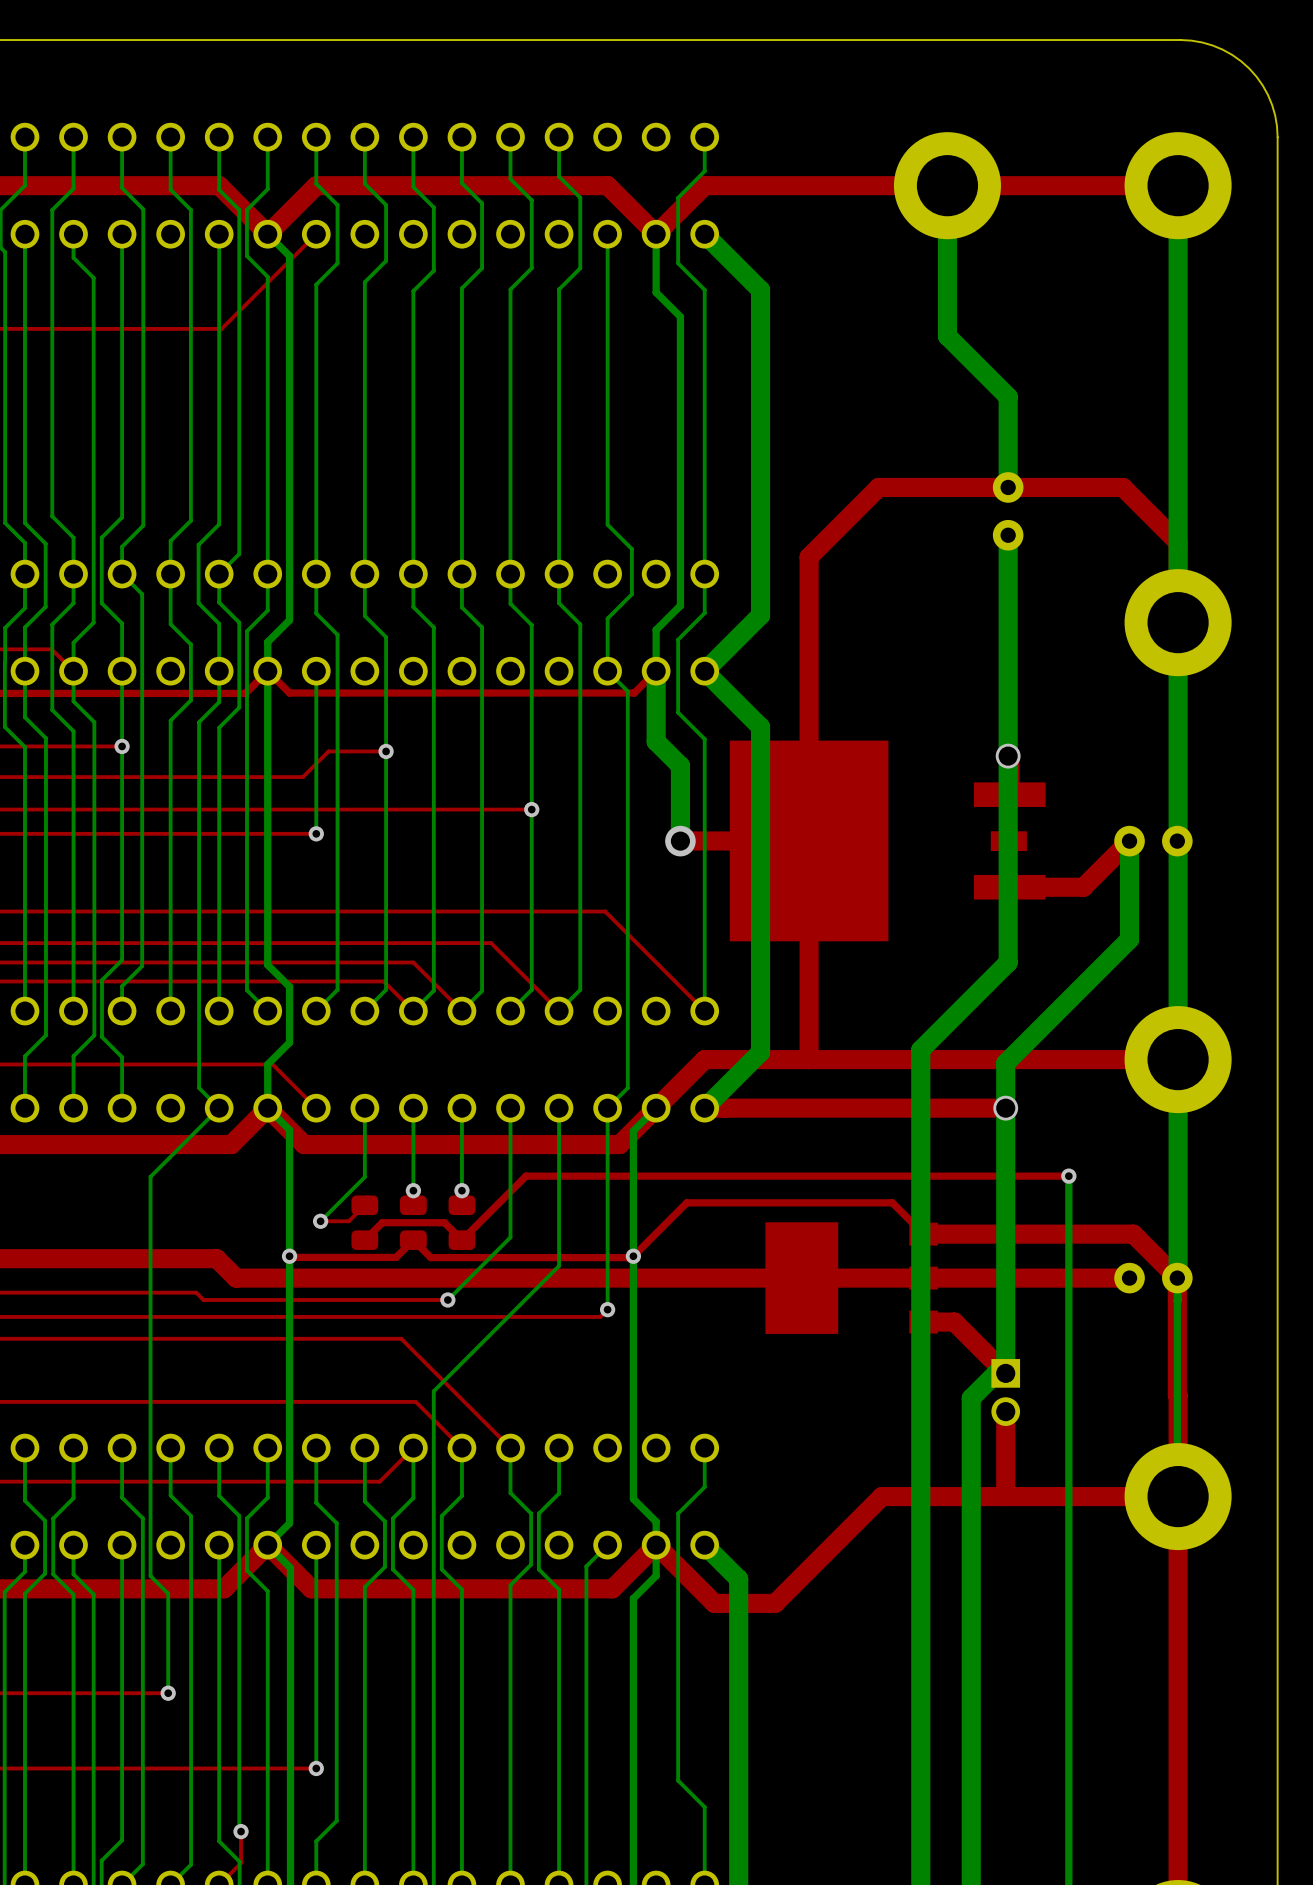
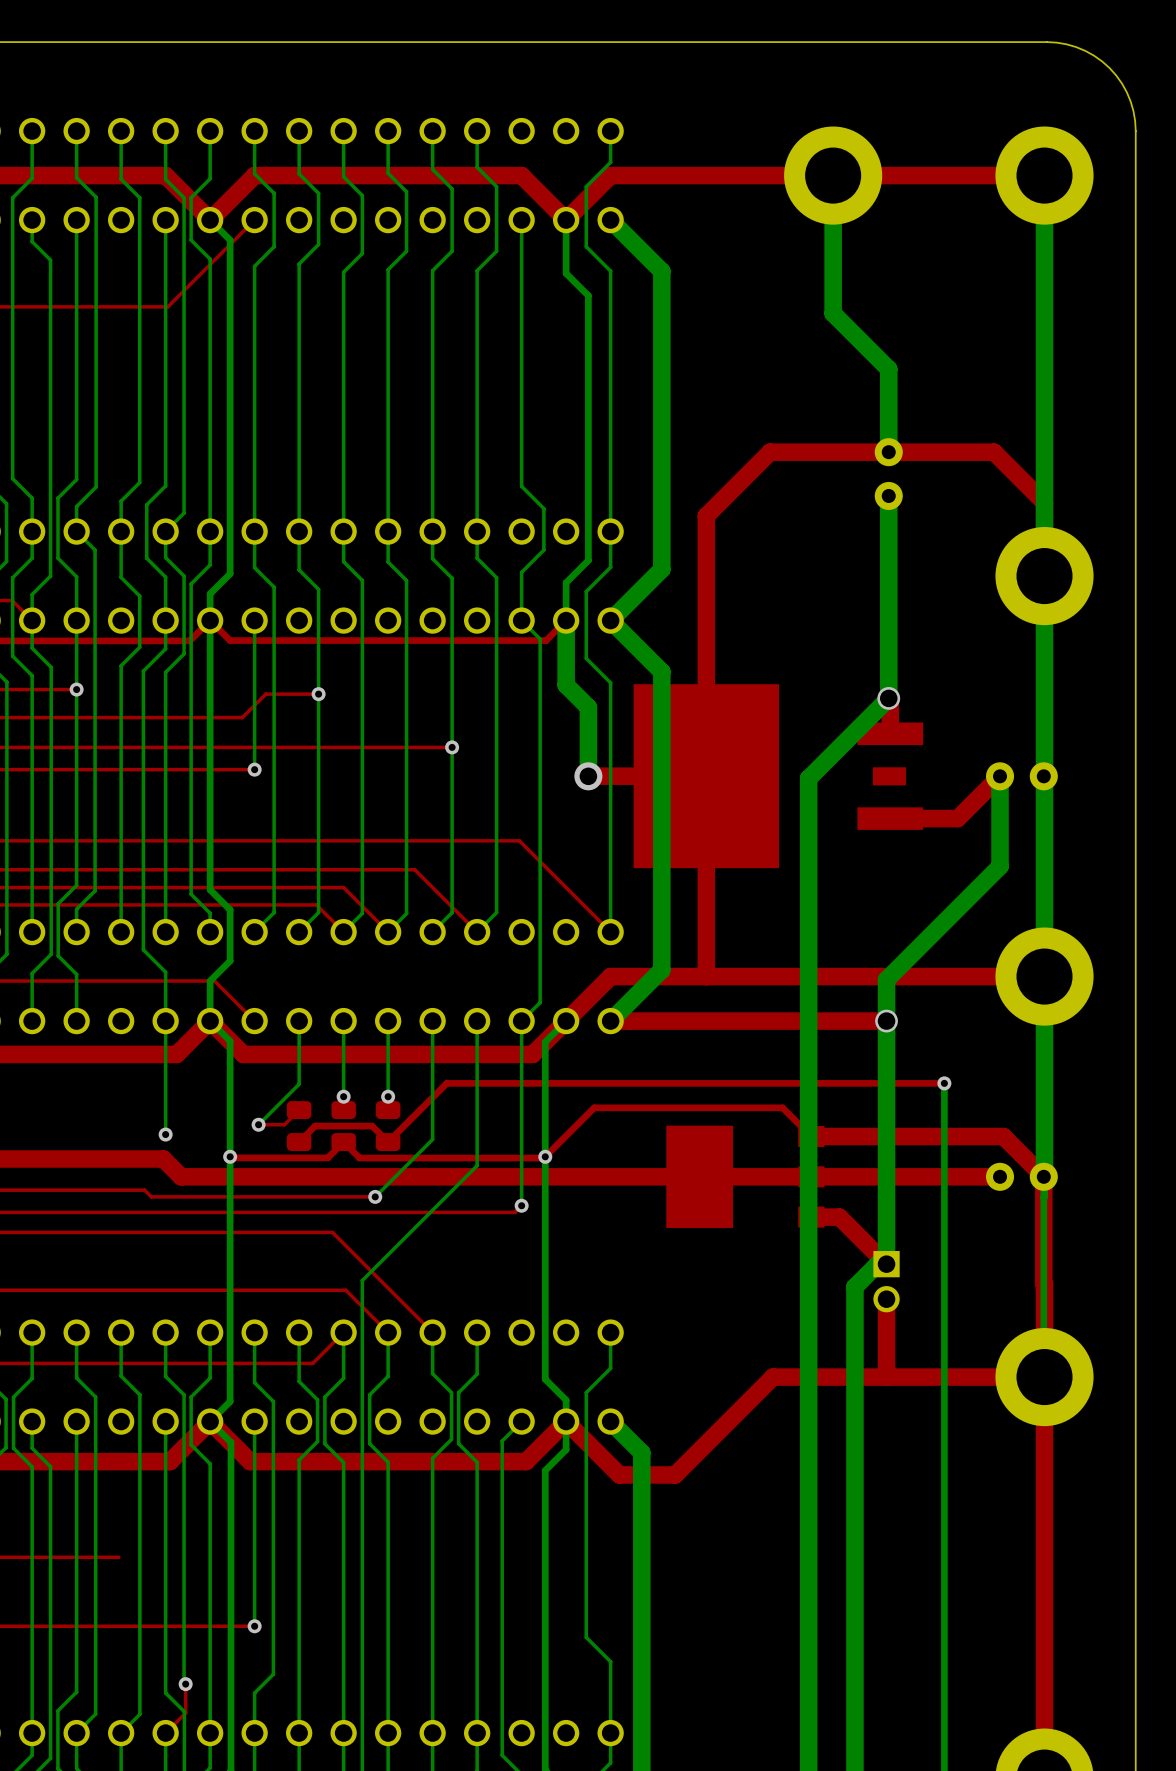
bottom track: (199, 722) (199, 1088) (219, 1108) (150, 1176) (150, 1576) (168, 1593) (168, 1693) -> (147, 667) (143, 671) (143, 949) (165, 972) (165, 1134)
bottom track: (1008, 756) (1008, 962) (920, 1049) -> (888, 698) (808, 778) (808, 967)
bottom track: (247, 969) (247, 990) (267, 1011) -> (191, 894) (210, 913) (210, 932)
via: none -> (165, 1134)
via: (168, 1693) -> none

